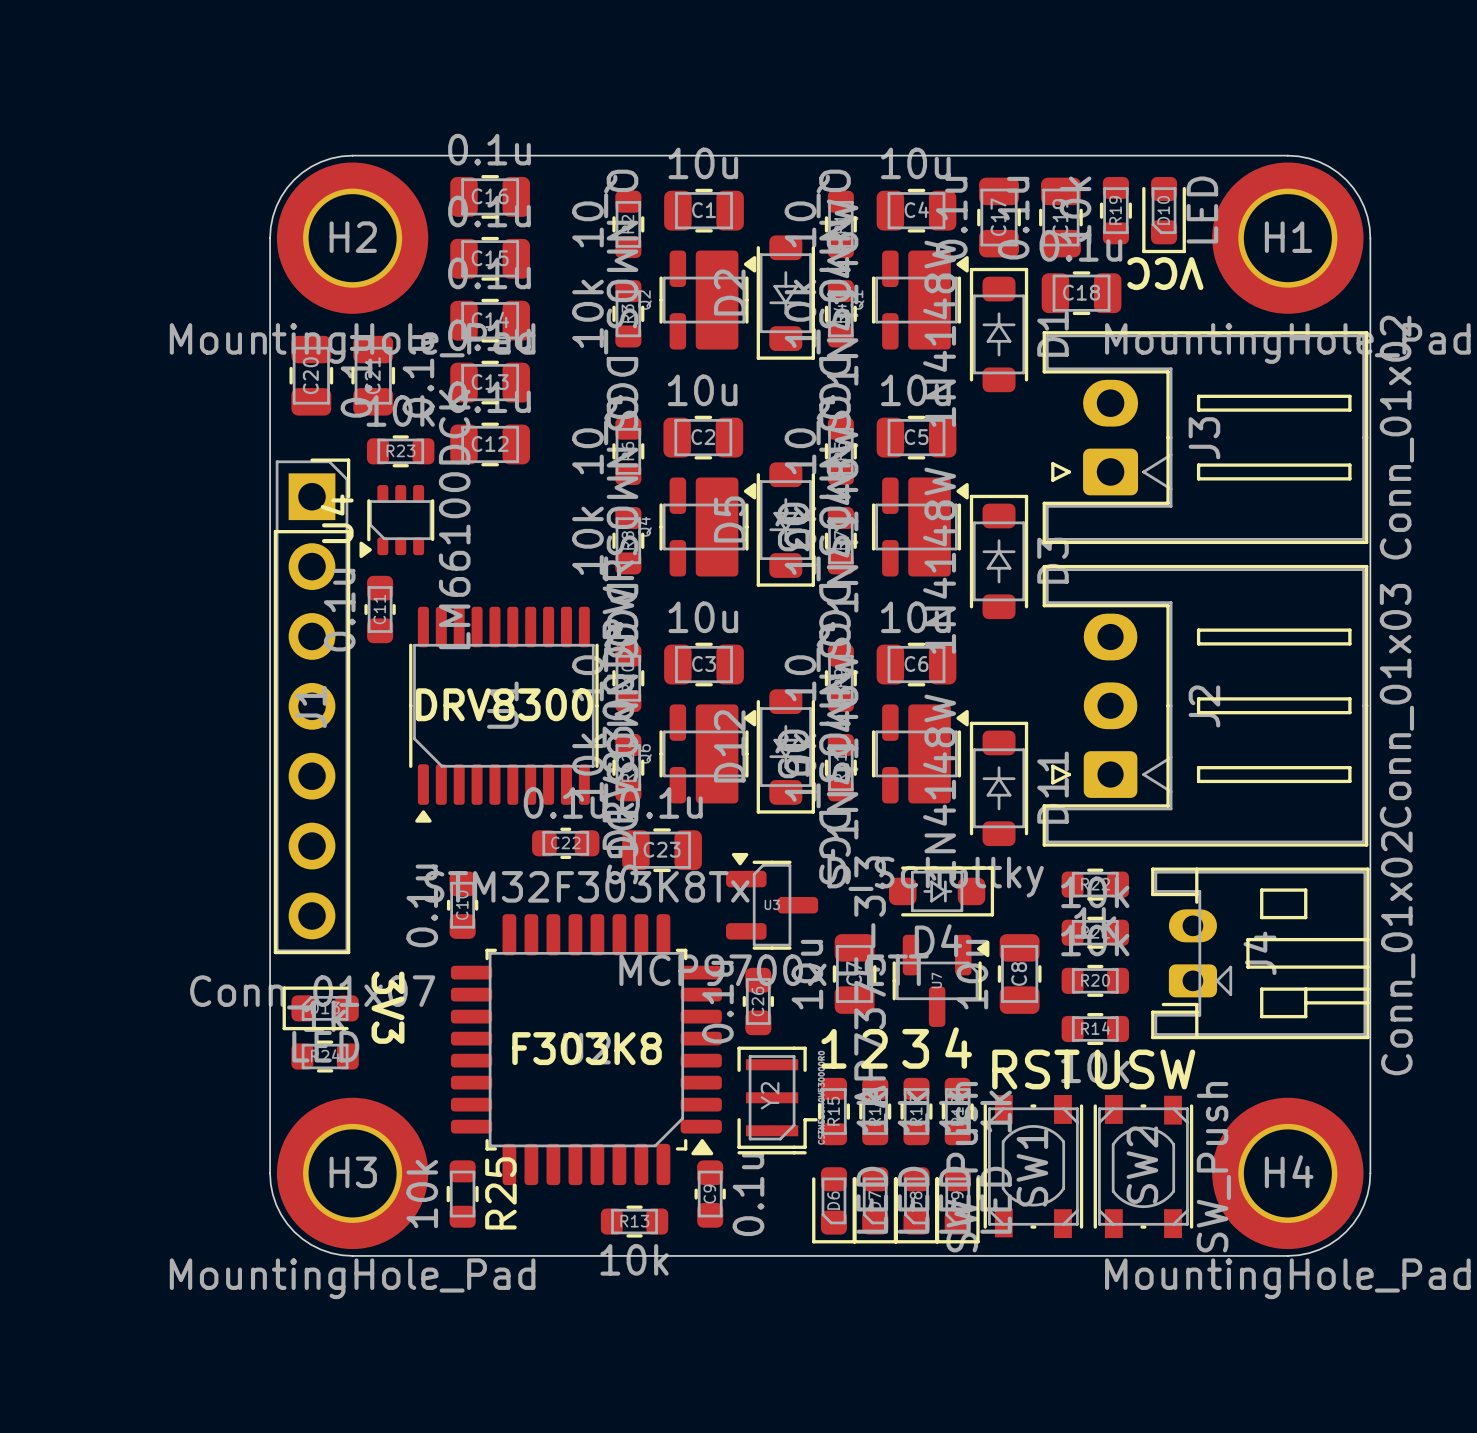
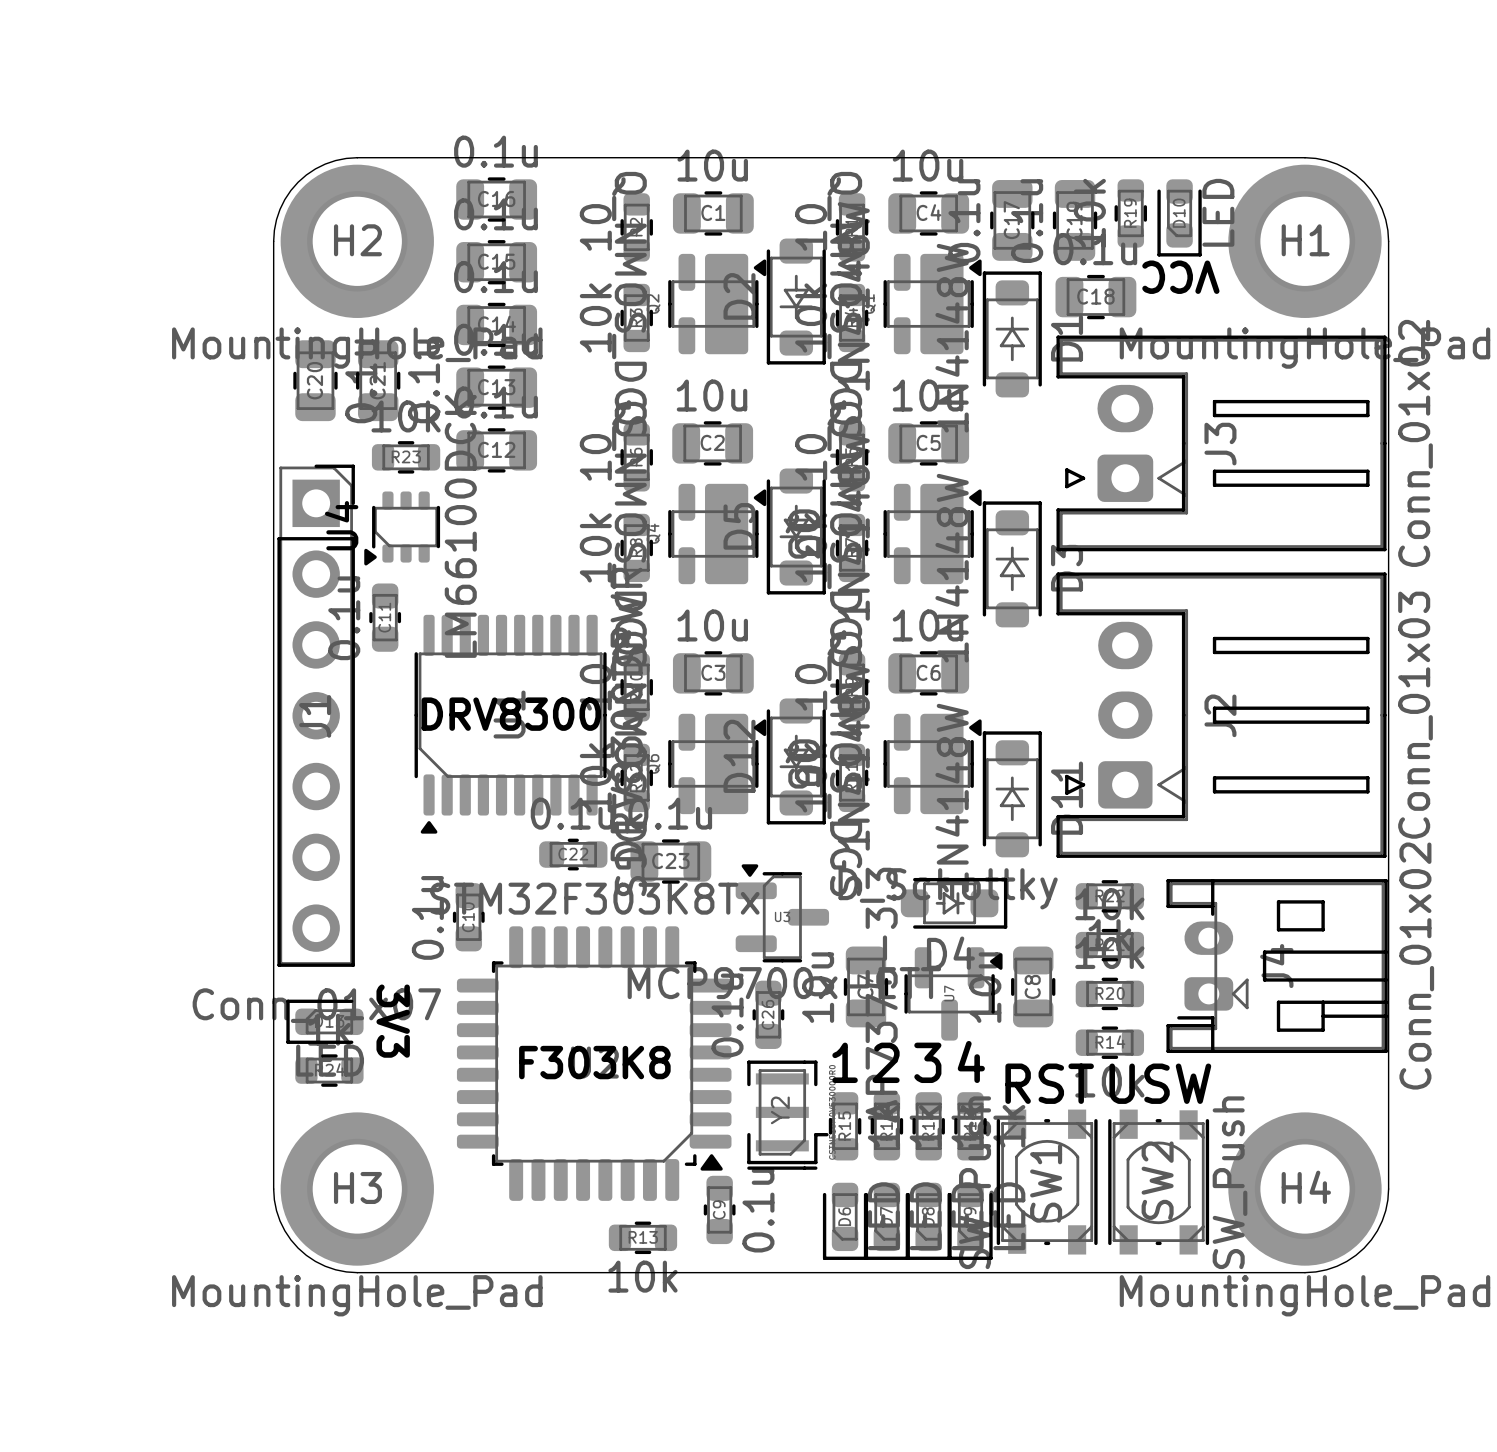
R25: 10k (462, 1194) -> none

